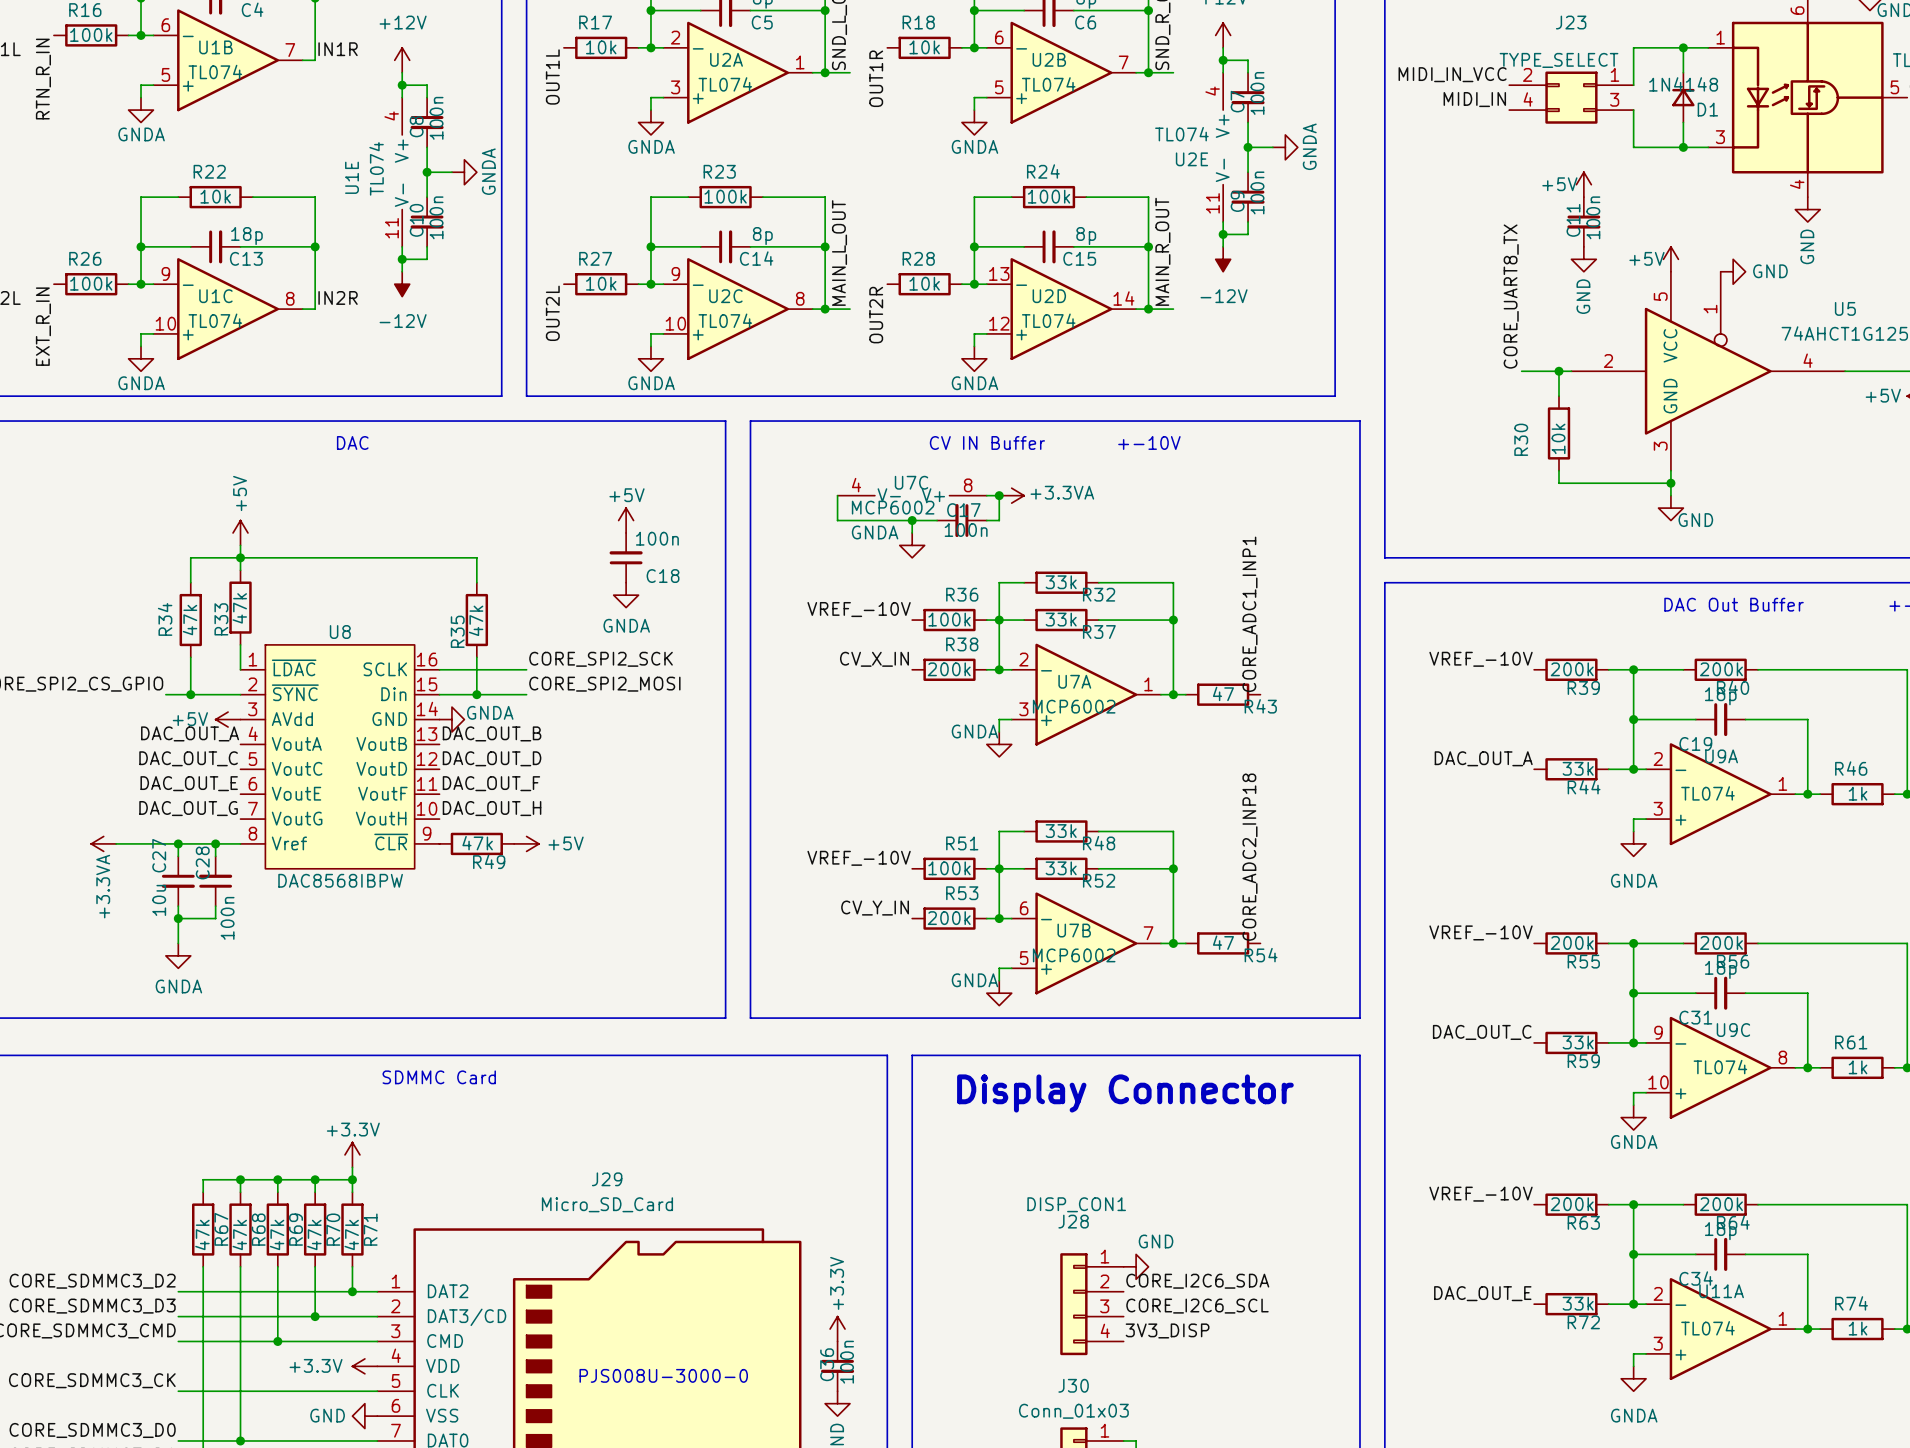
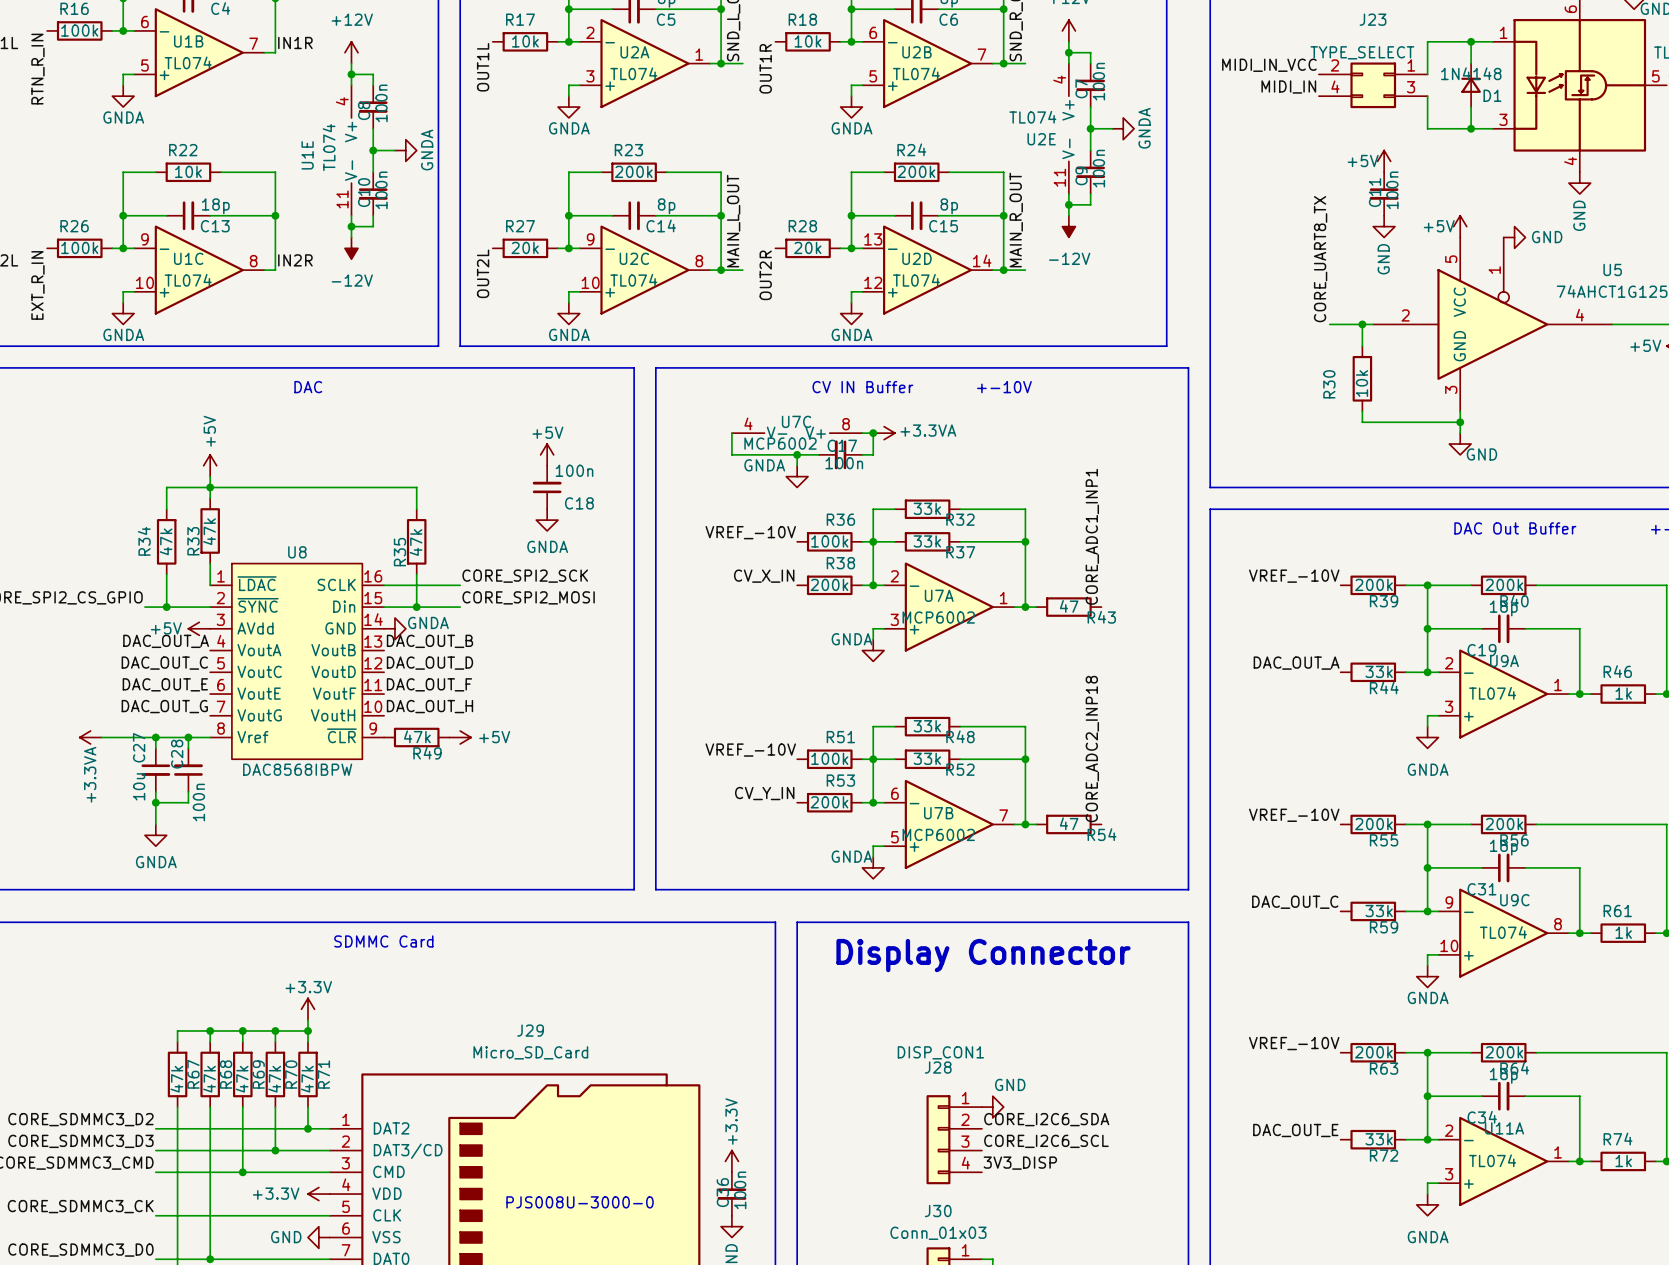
R23 value: 100k (725, 196) -> 200k (633, 171)
R24 value: 100k (1049, 196) -> 200k (916, 171)
R27 value: 10k (601, 283) -> 20k (525, 247)
R28 value: 10k (924, 283) -> 20k (807, 247)

